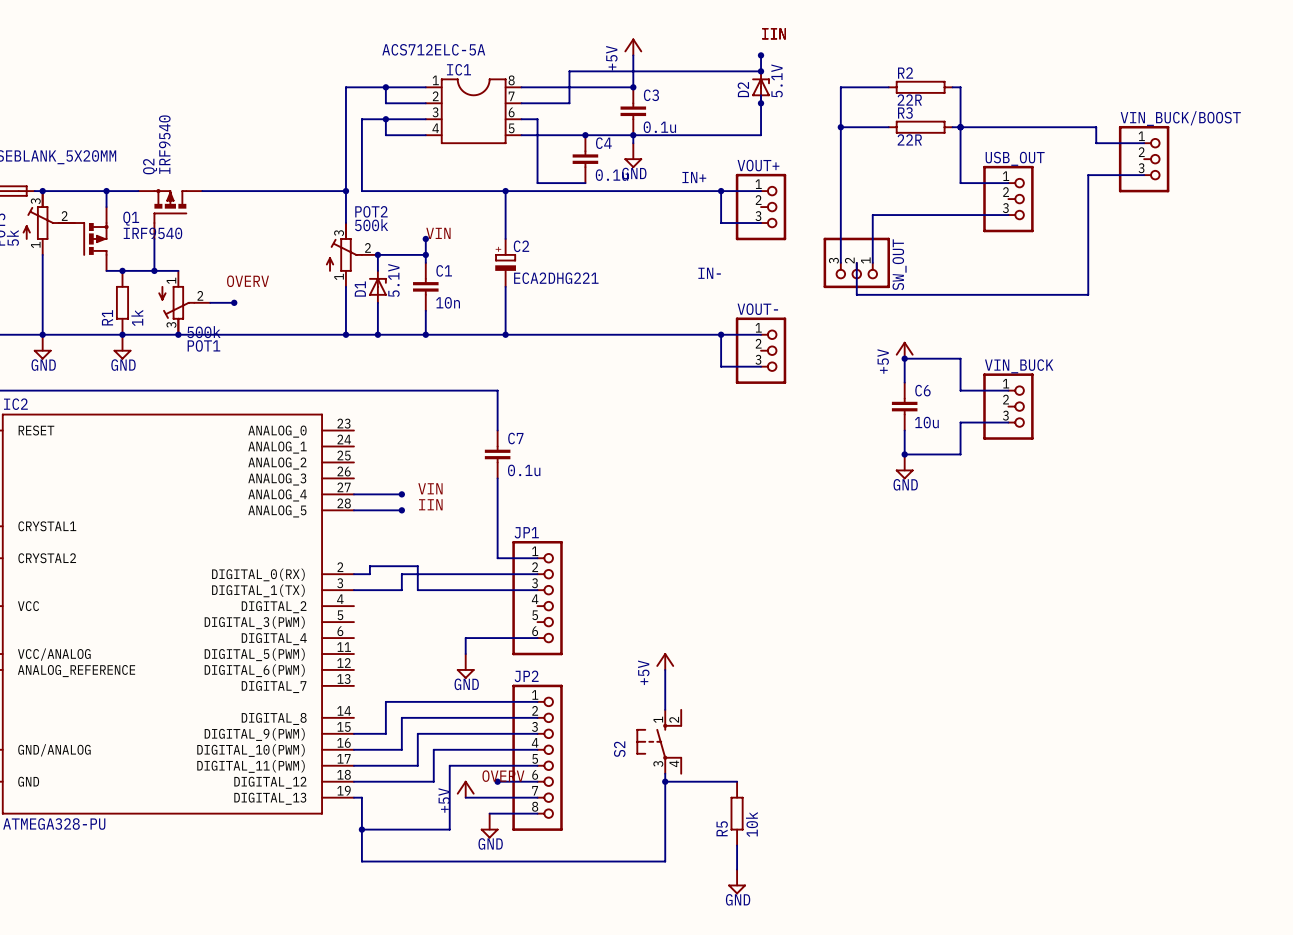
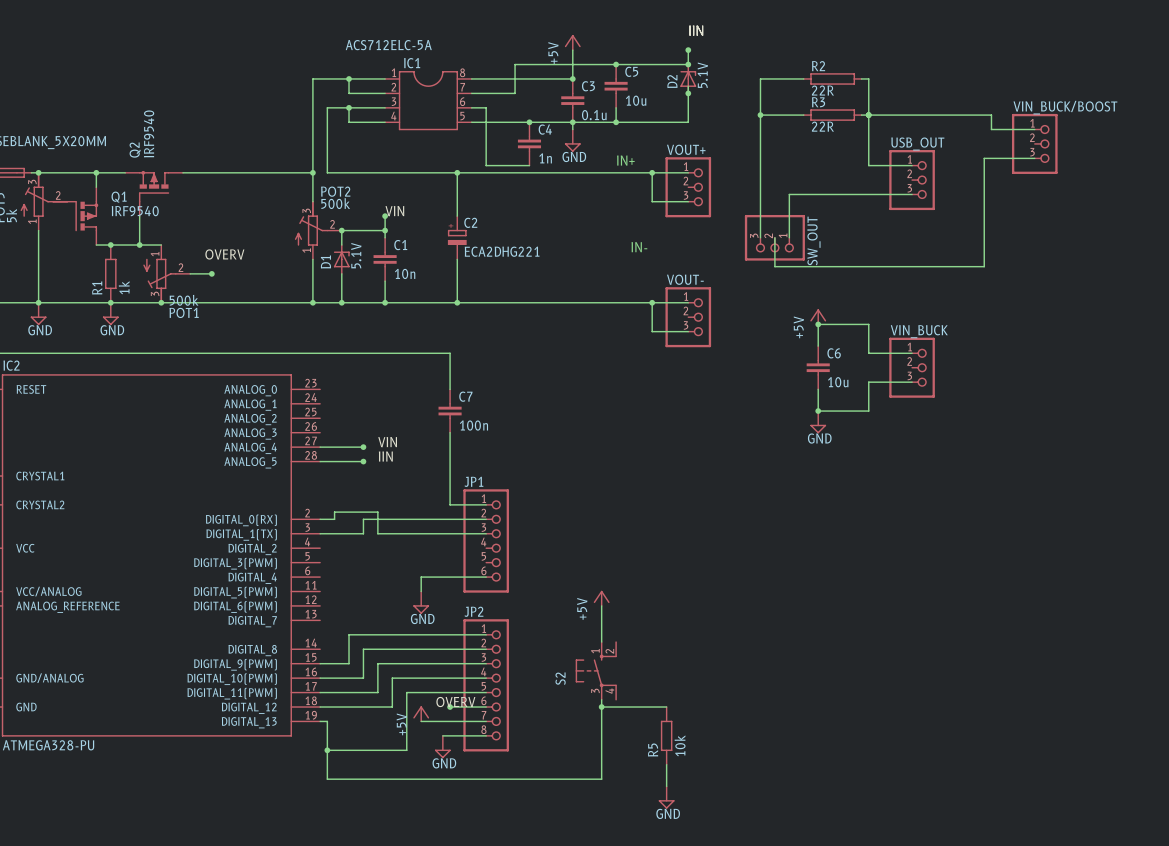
junction: none -> (616, 64)
C5: none -> 10u (616, 86)
wire: none -> (616, 107) (616, 122)
junction: none -> (616, 122)
C4 value: 0.1u (611, 175) -> 1n (545, 158)
C7 value: 0.1u (524, 470) -> 100n (473, 425)

